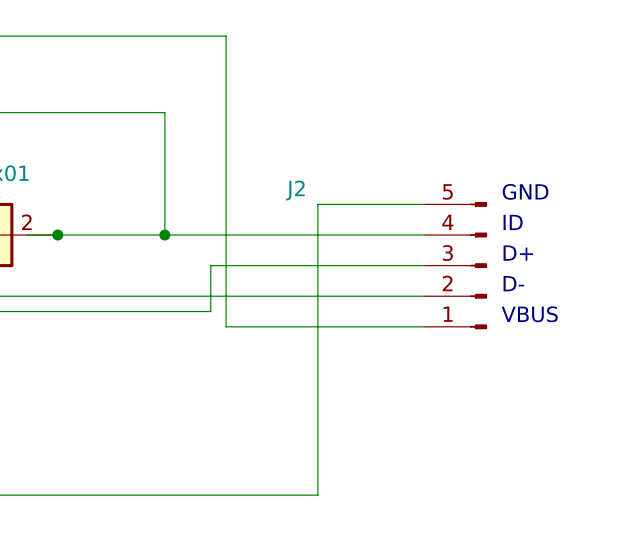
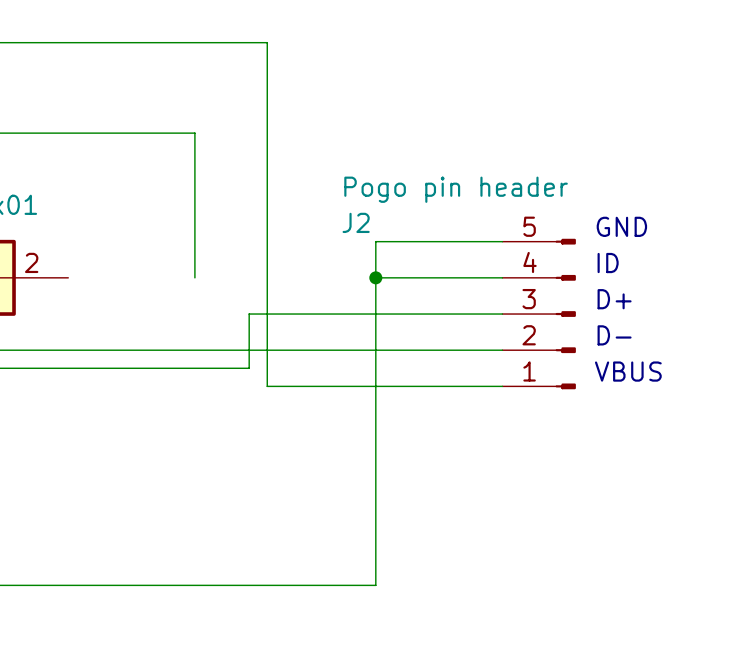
J2 value: none -> Pogo pin header (456, 189)
wire: (27, 235) (317, 235) -> none
junction: (57, 235) -> none
junction: (164, 235) -> none
junction: none -> (375, 277)

